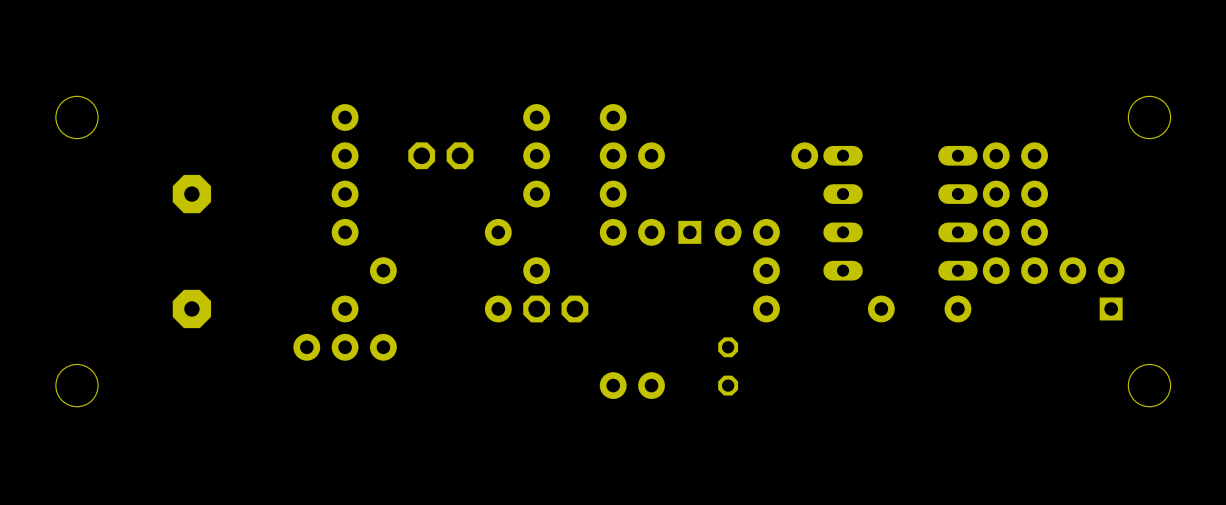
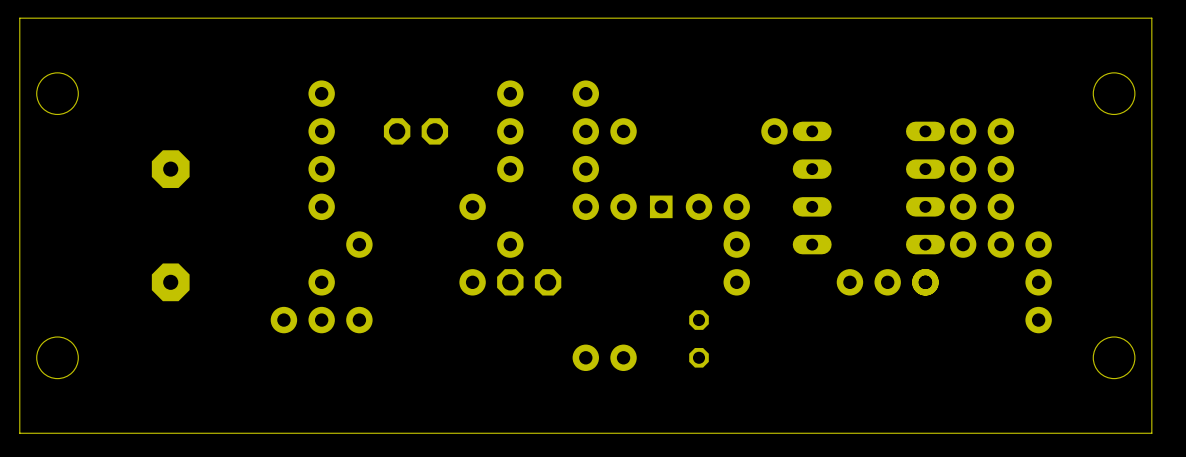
board edge: none -> (1151, 18) (19, 18) (19, 433) (1151, 433) (1151, 18)
part: (1111, 288) -> none
part: none -> (906, 282)
part: none -> (1038, 301)

